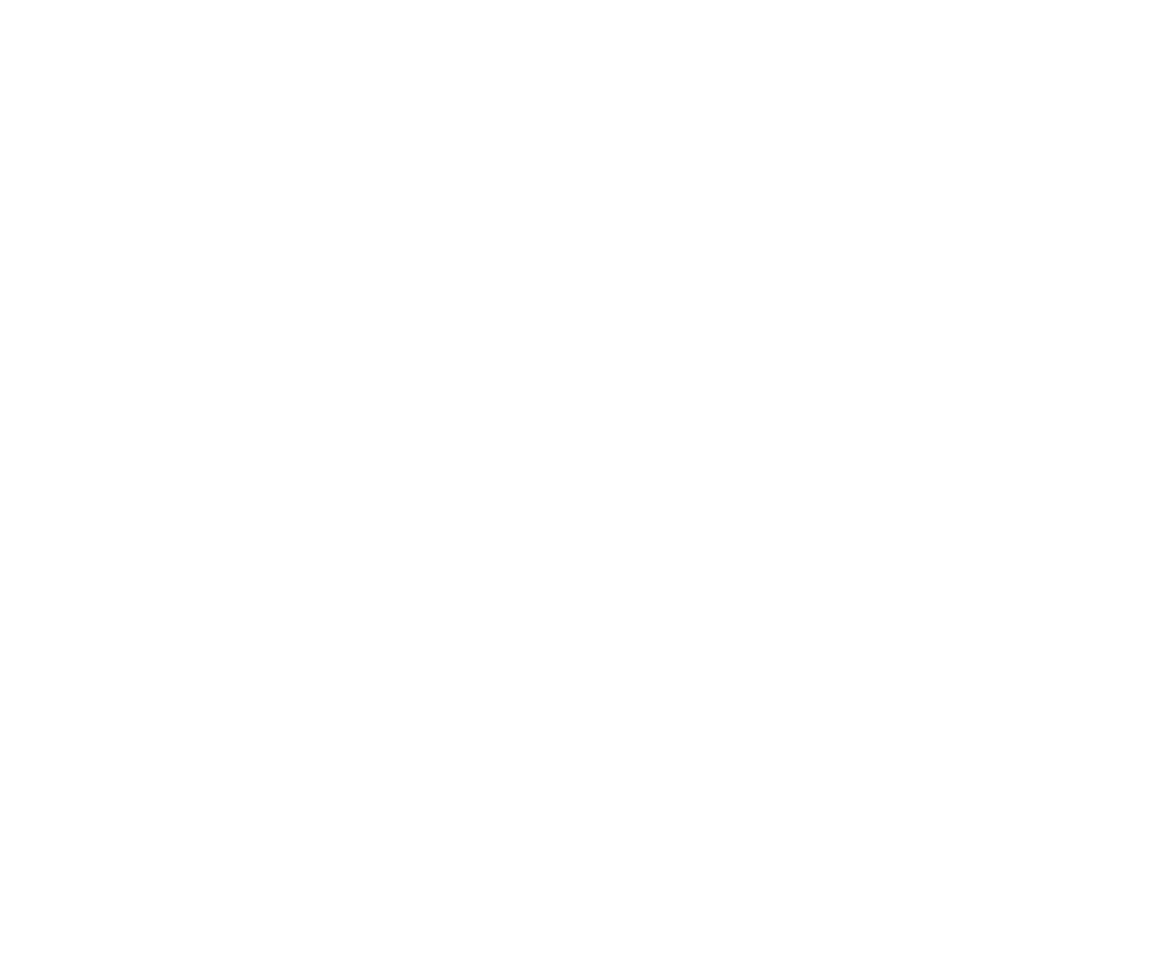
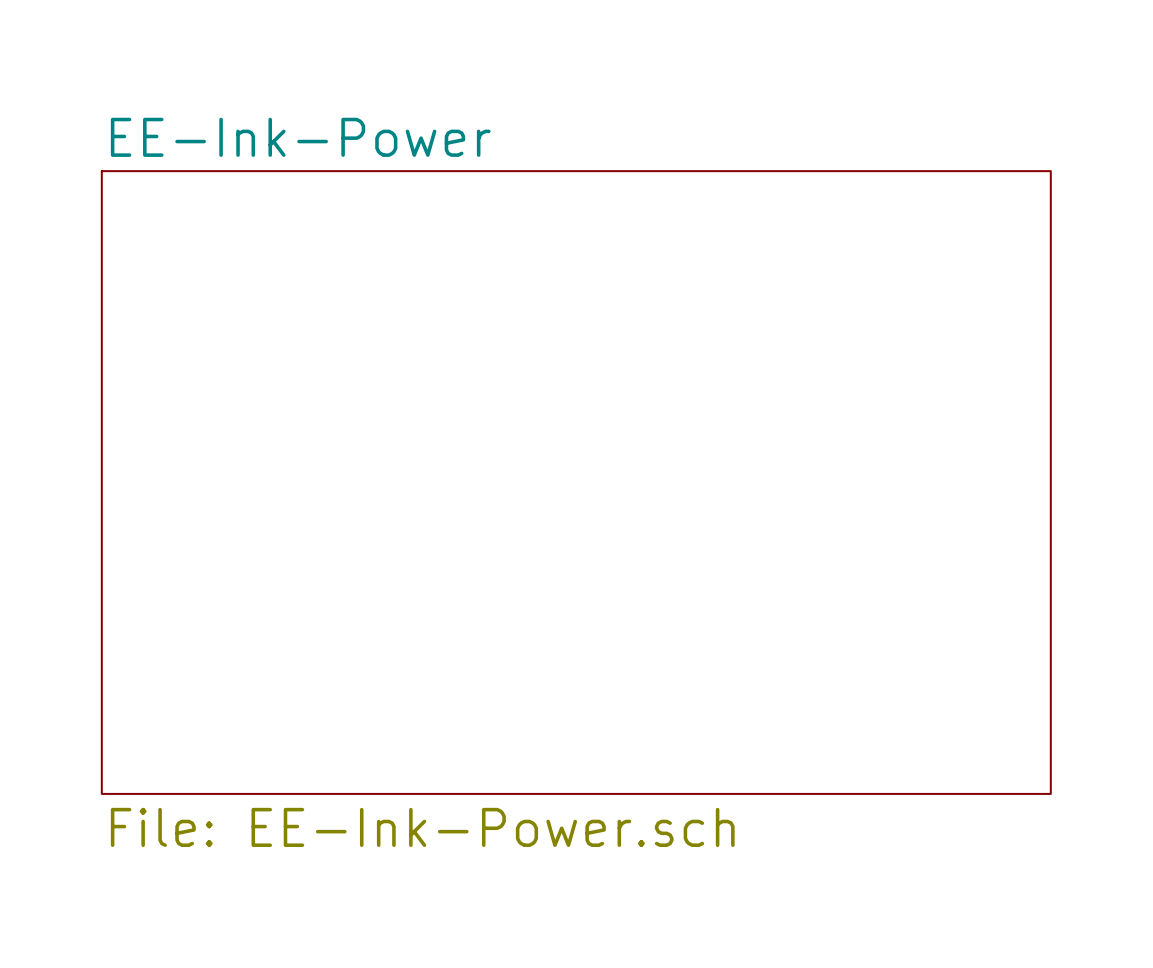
sheet EE-Ink-Power: none -> File: EE-Ink-Power.sch (576, 482)

